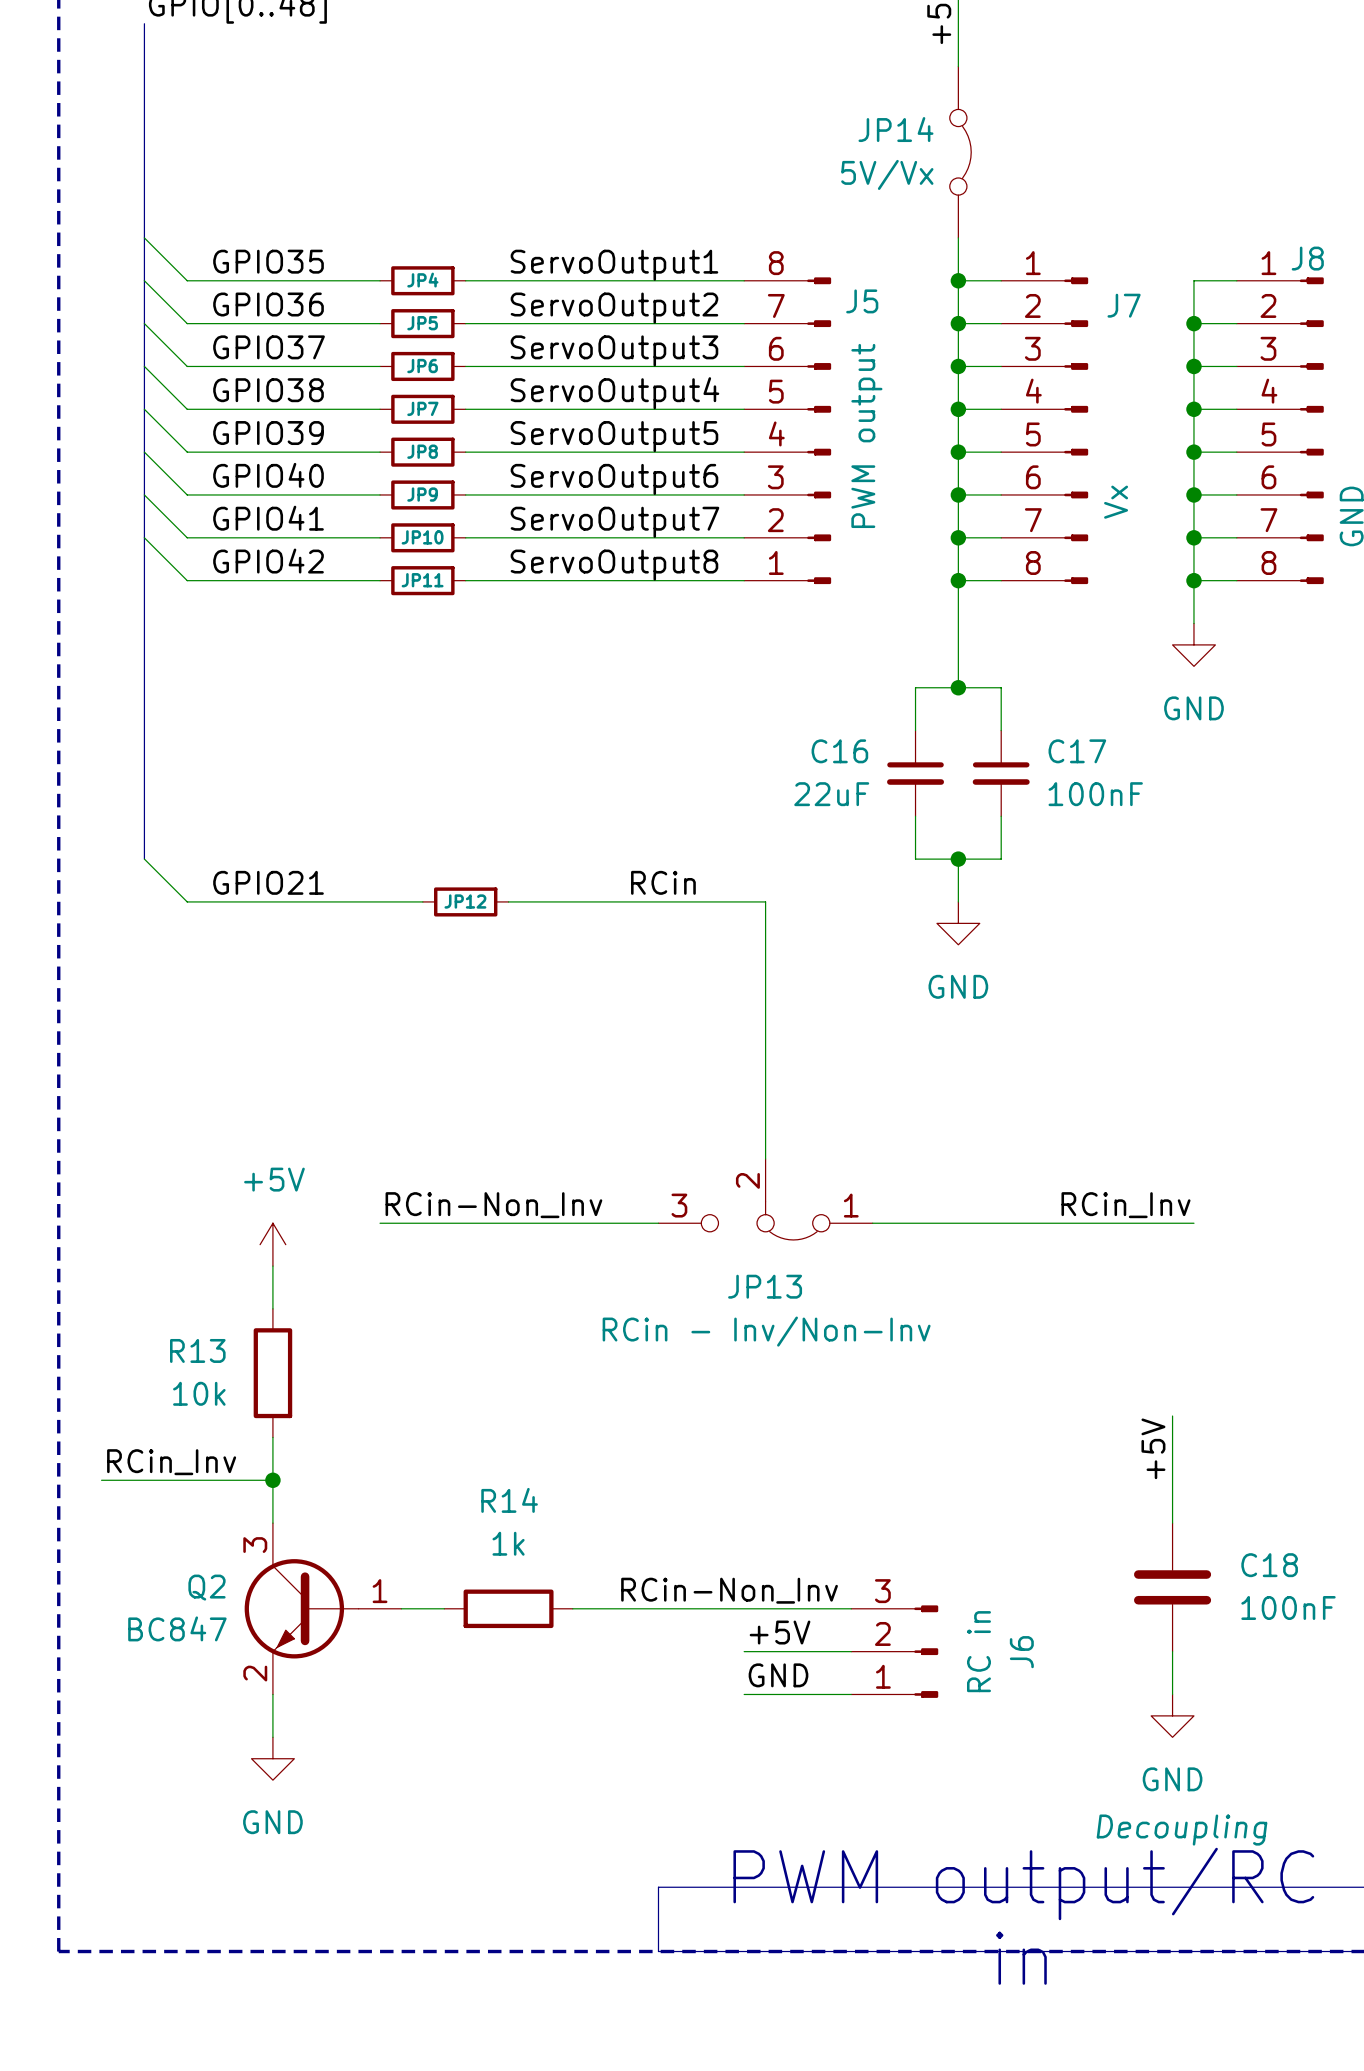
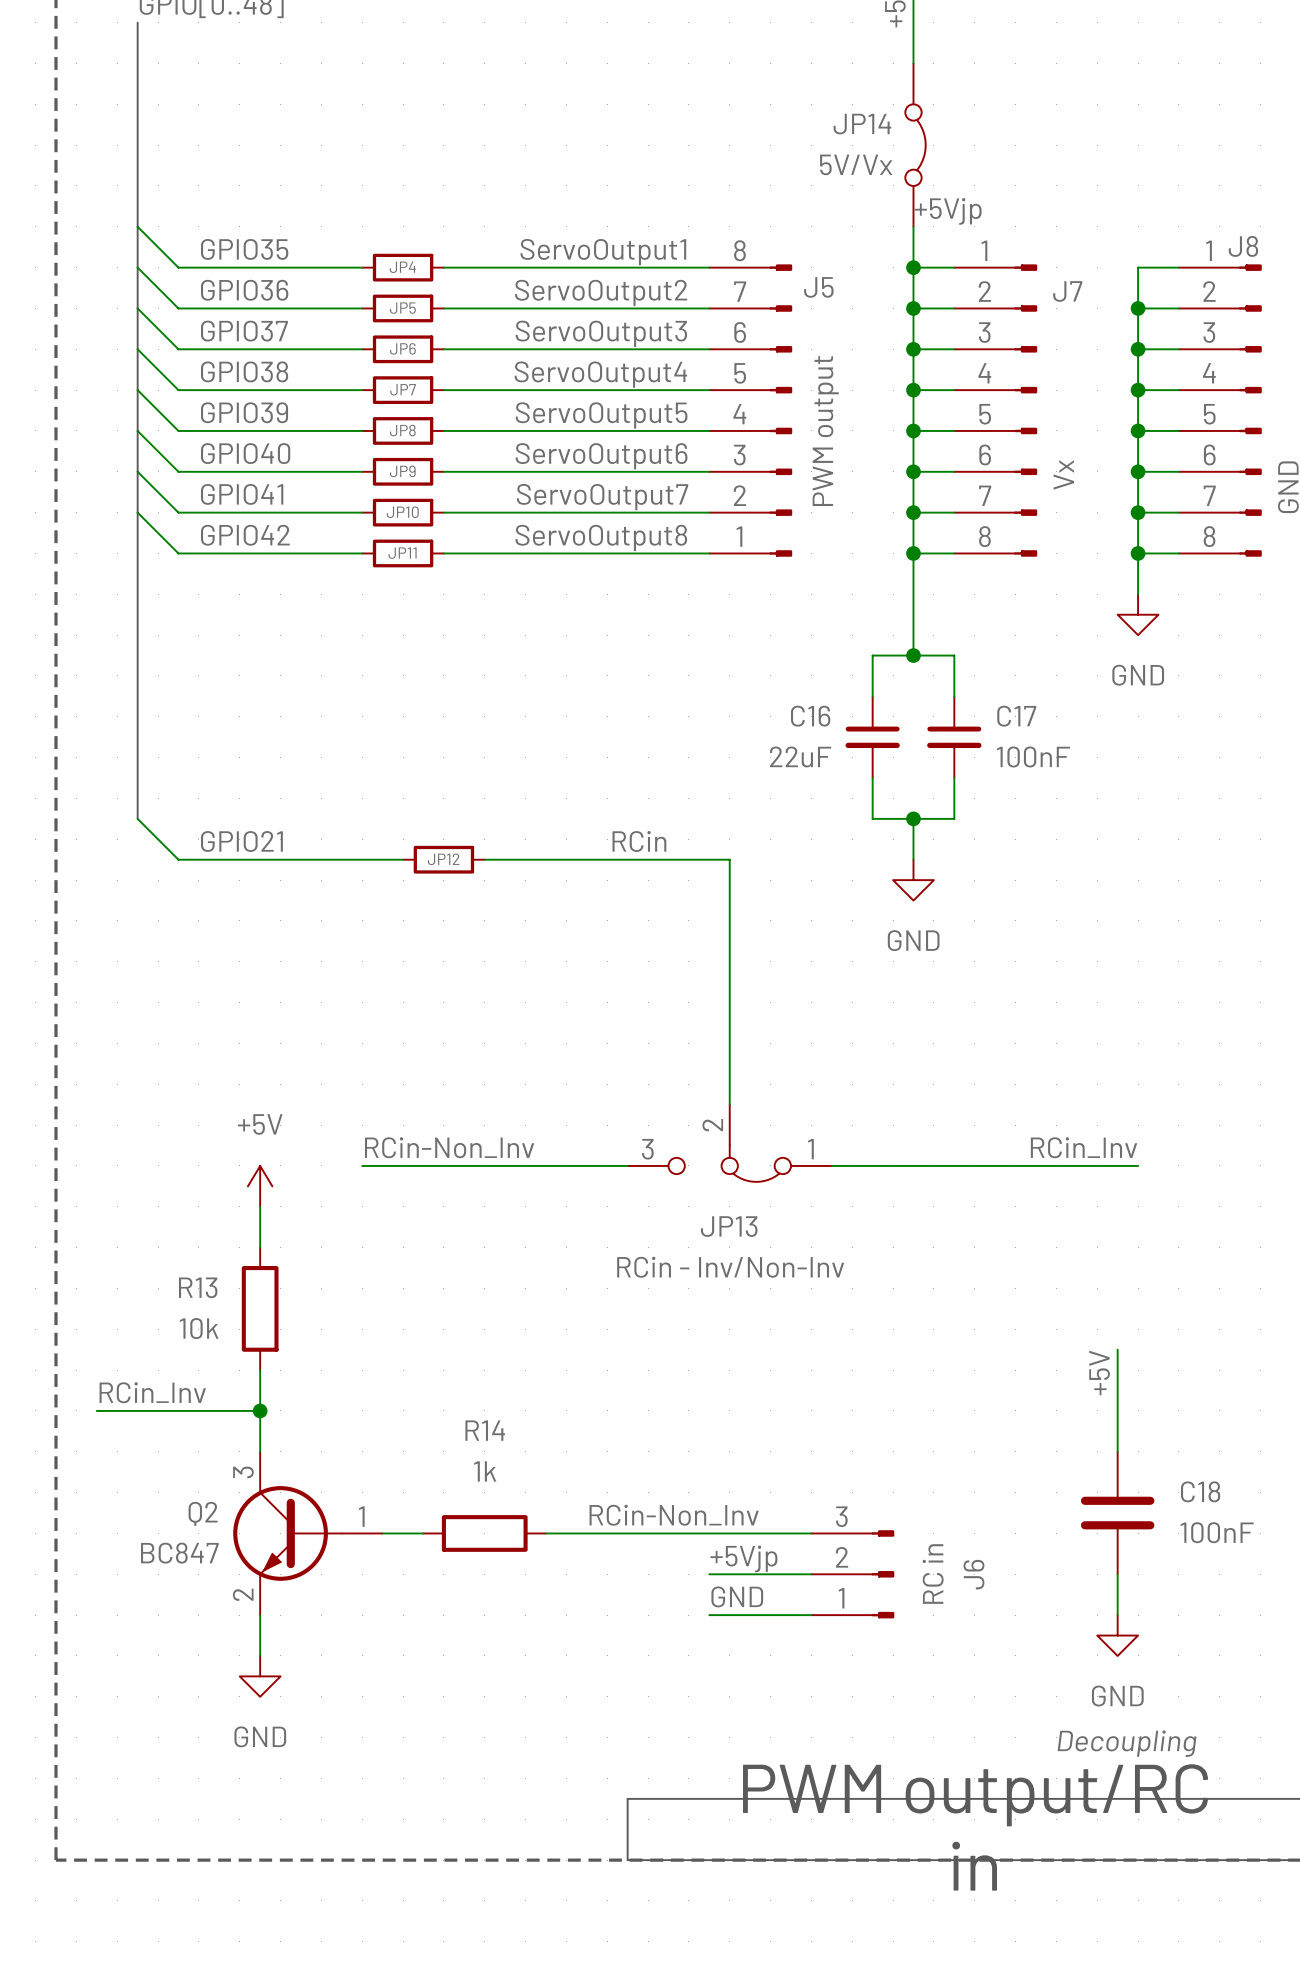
label: none -> +5Vjp (948, 211)
label: +5V (780, 1632) -> +5Vjp (743, 1558)

